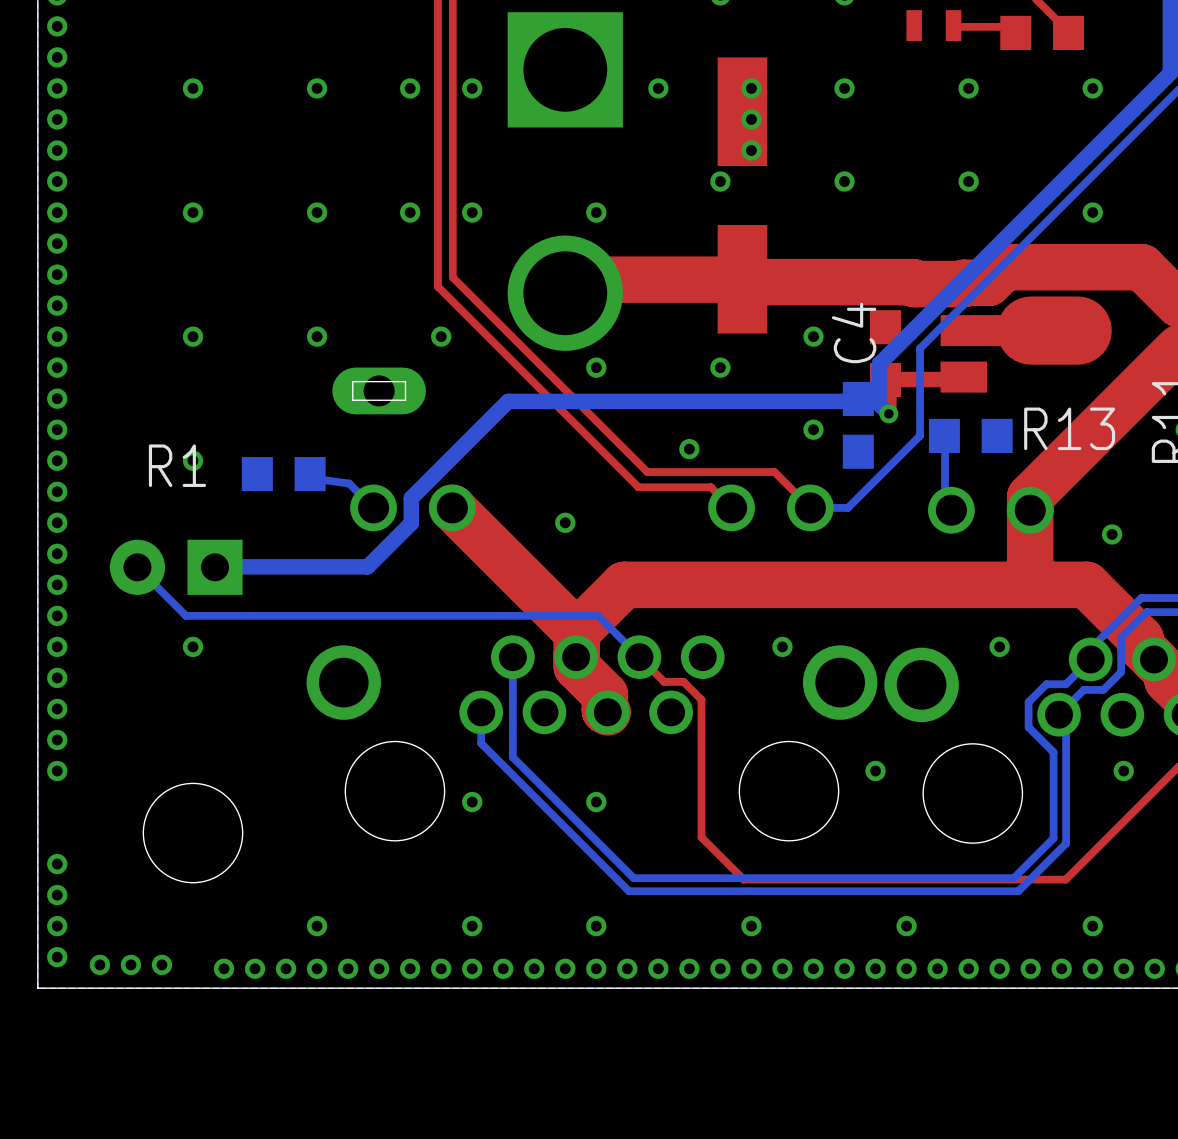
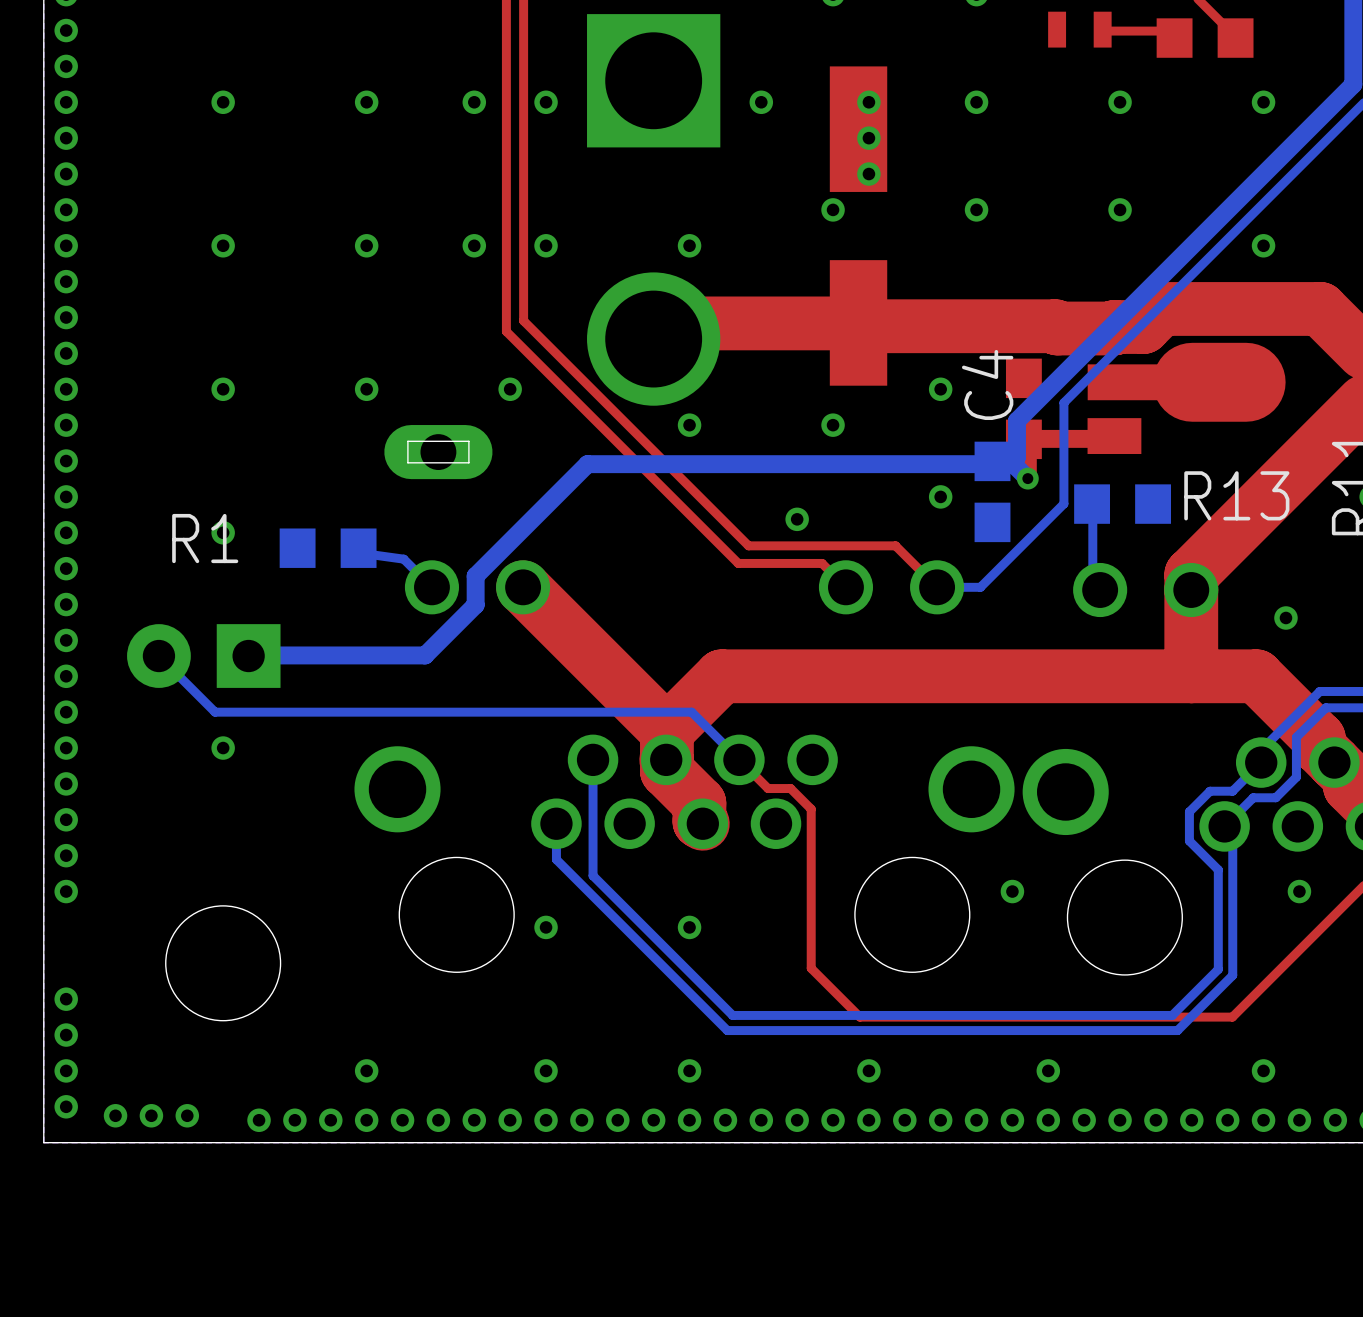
via: (565, 522) -> none
via: (782, 646) -> none
via: (999, 646) -> none

